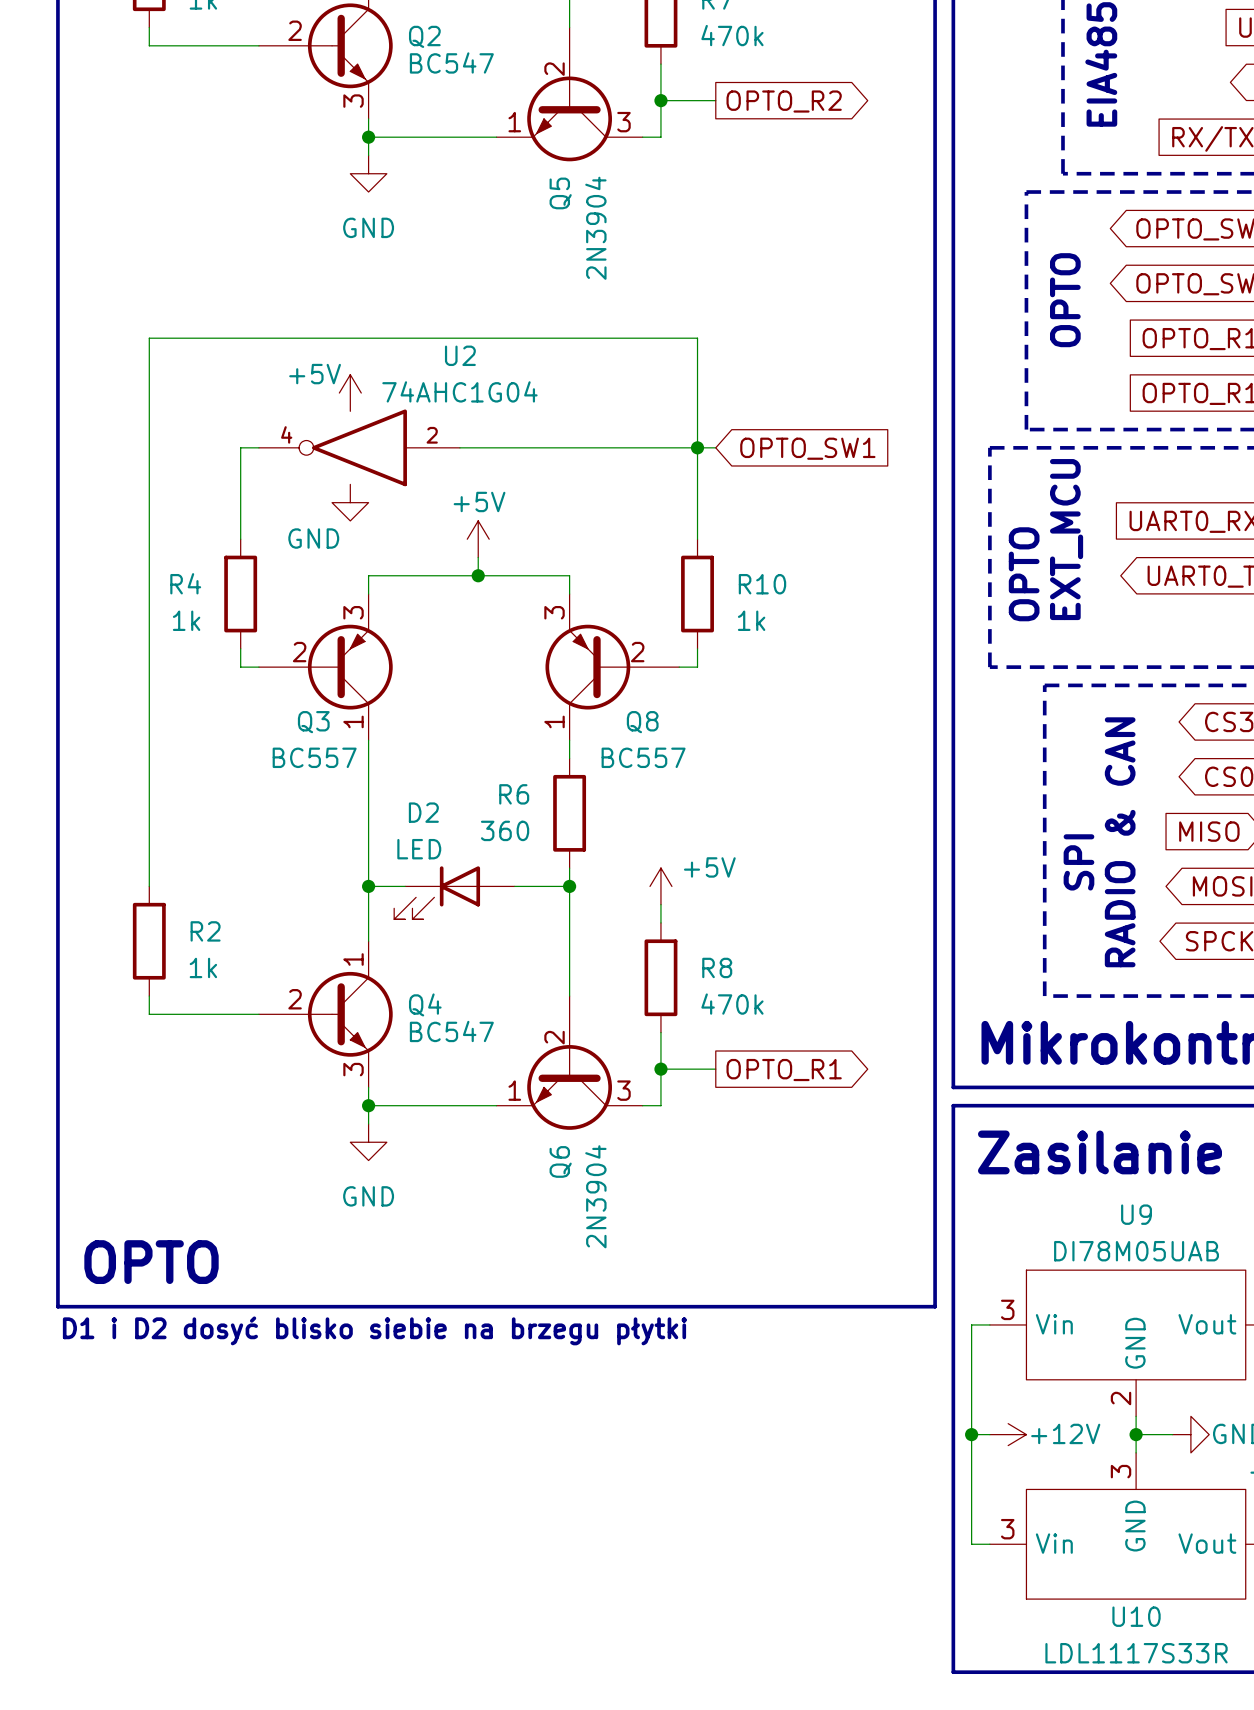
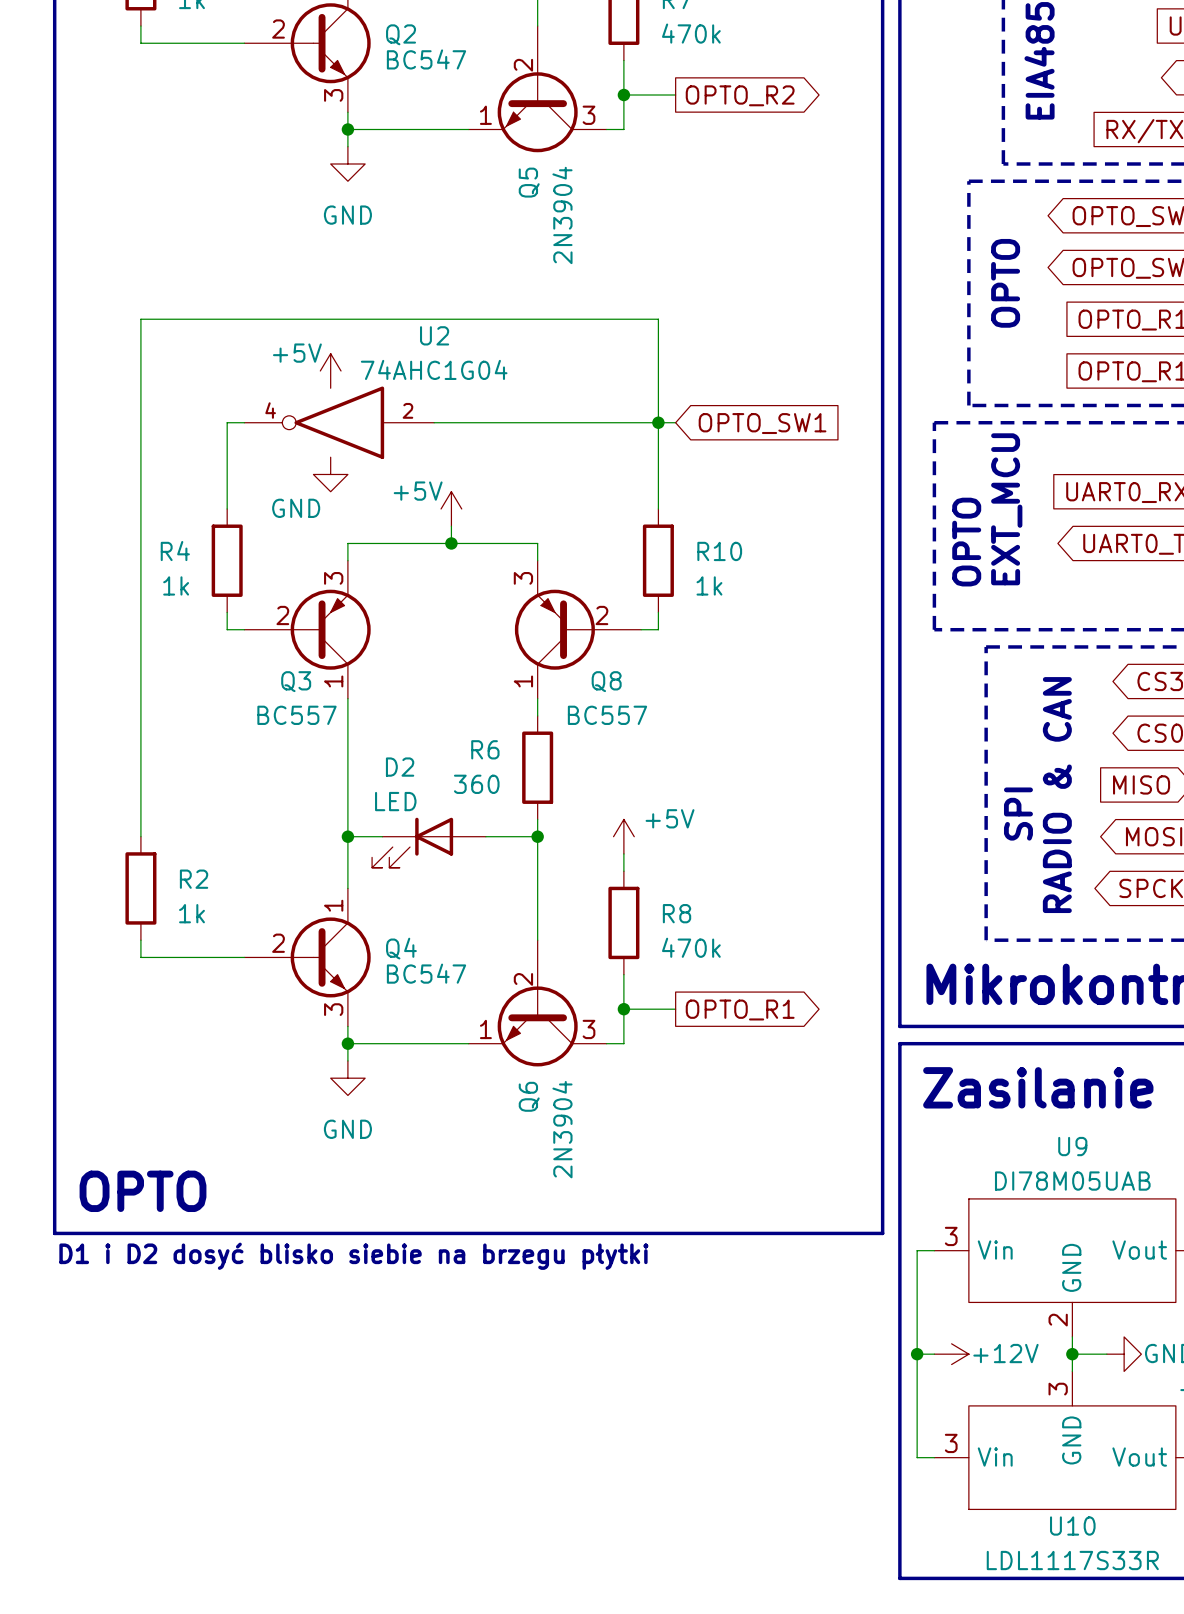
power symbol text position: +5V (479, 501) -> +5V (418, 491)

